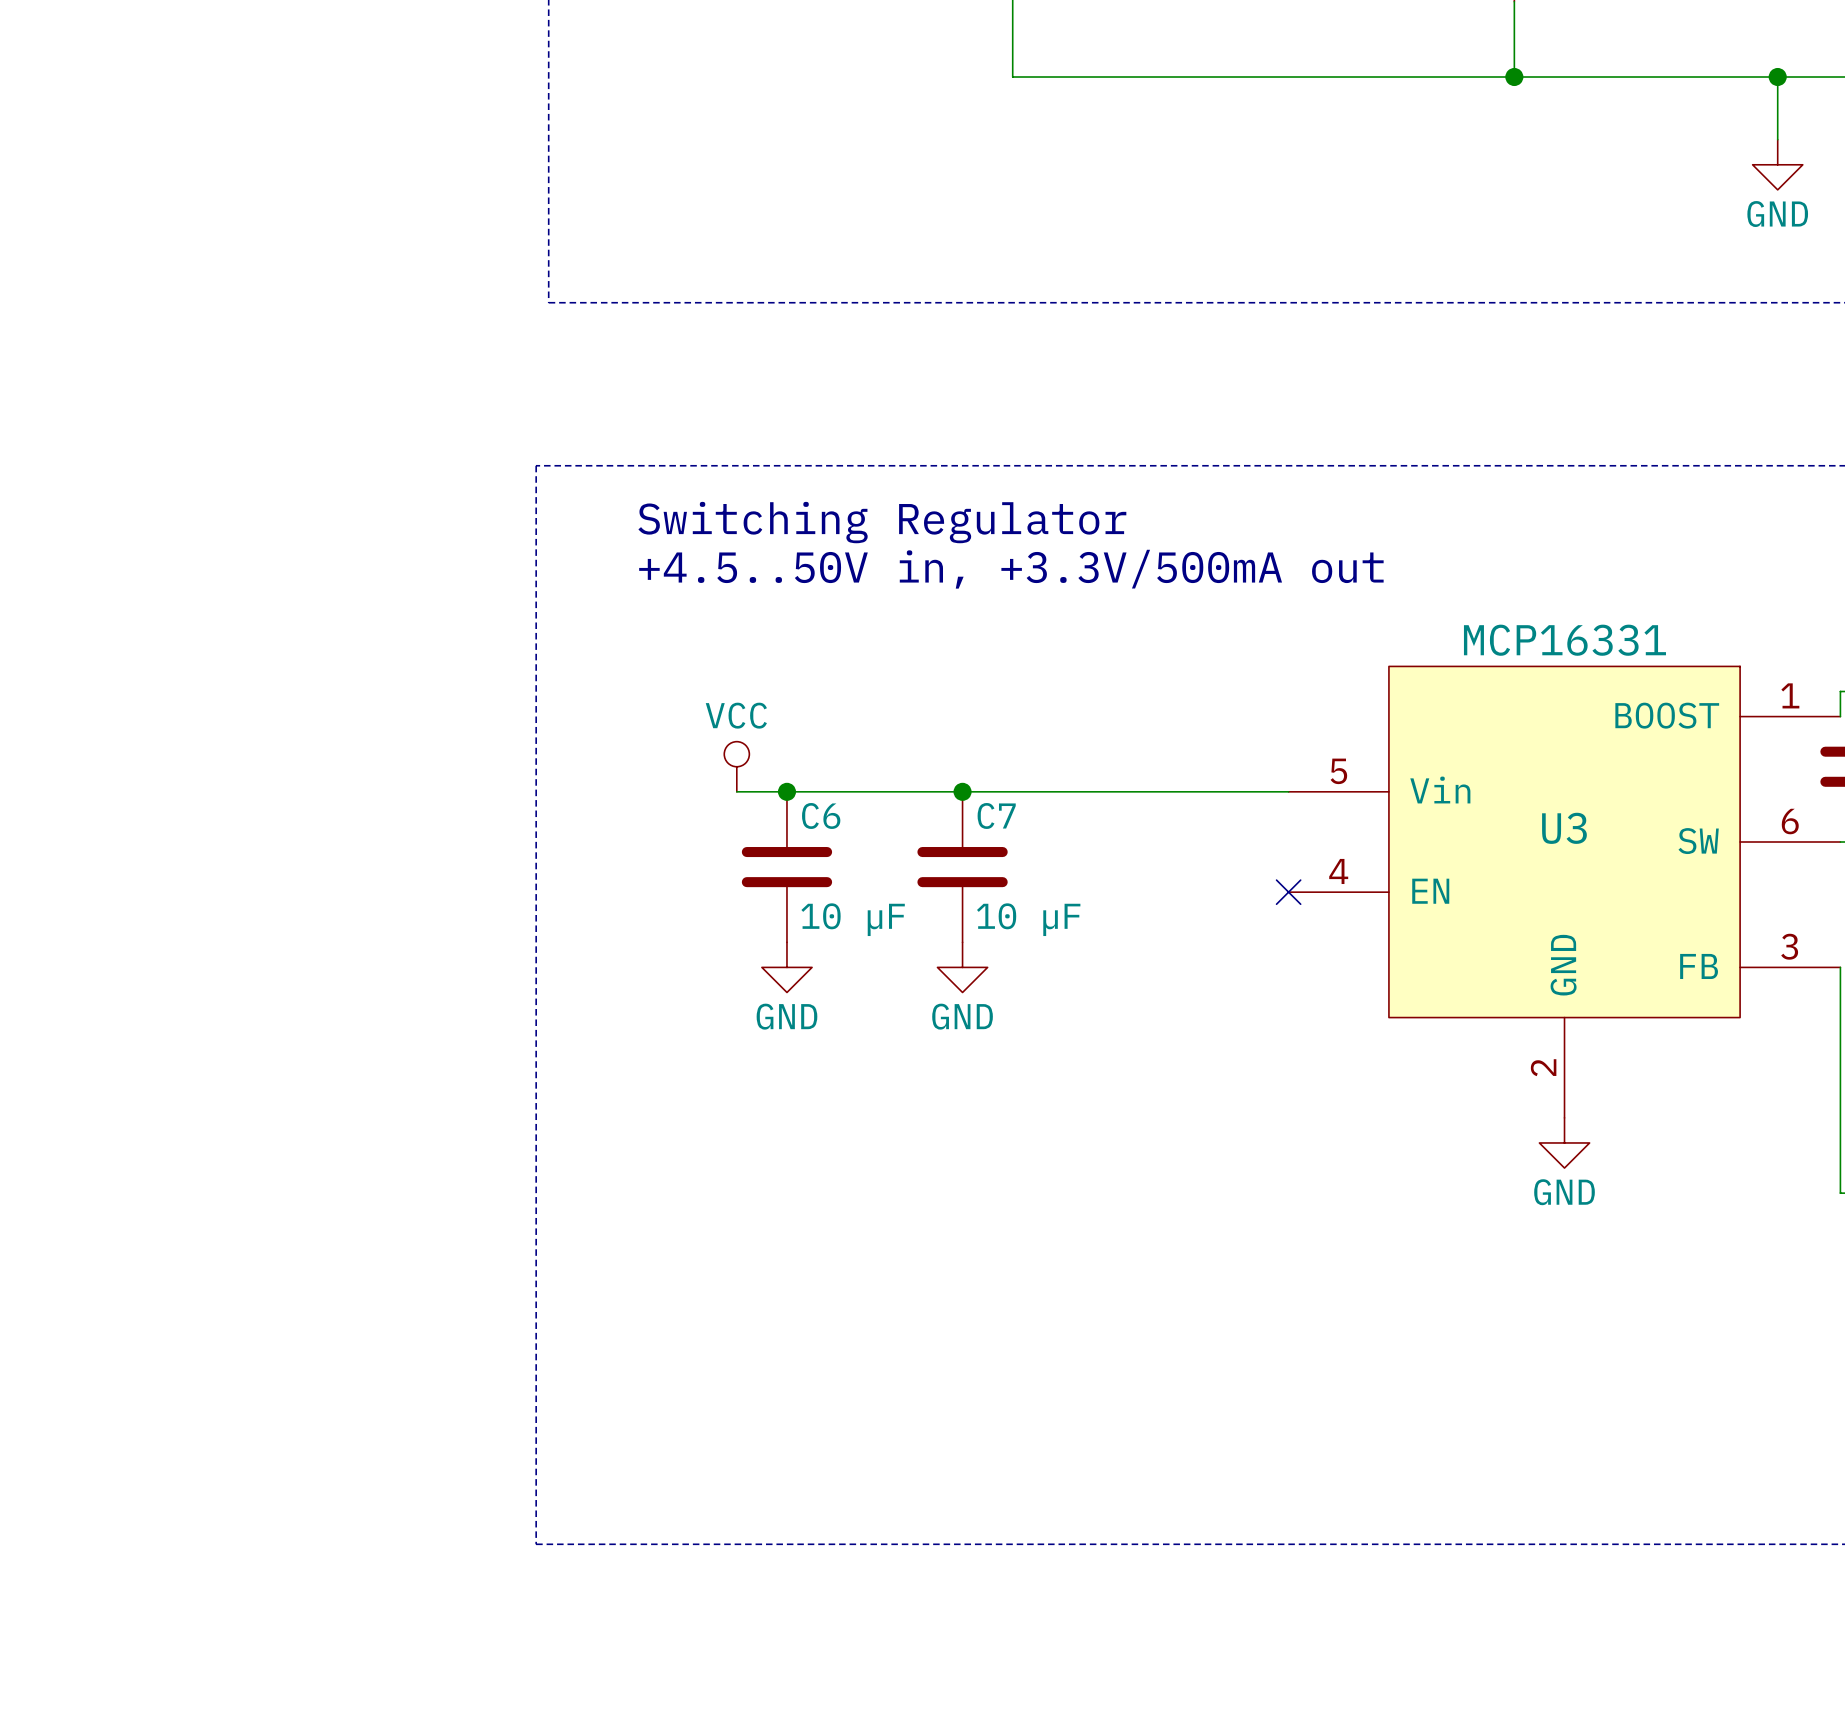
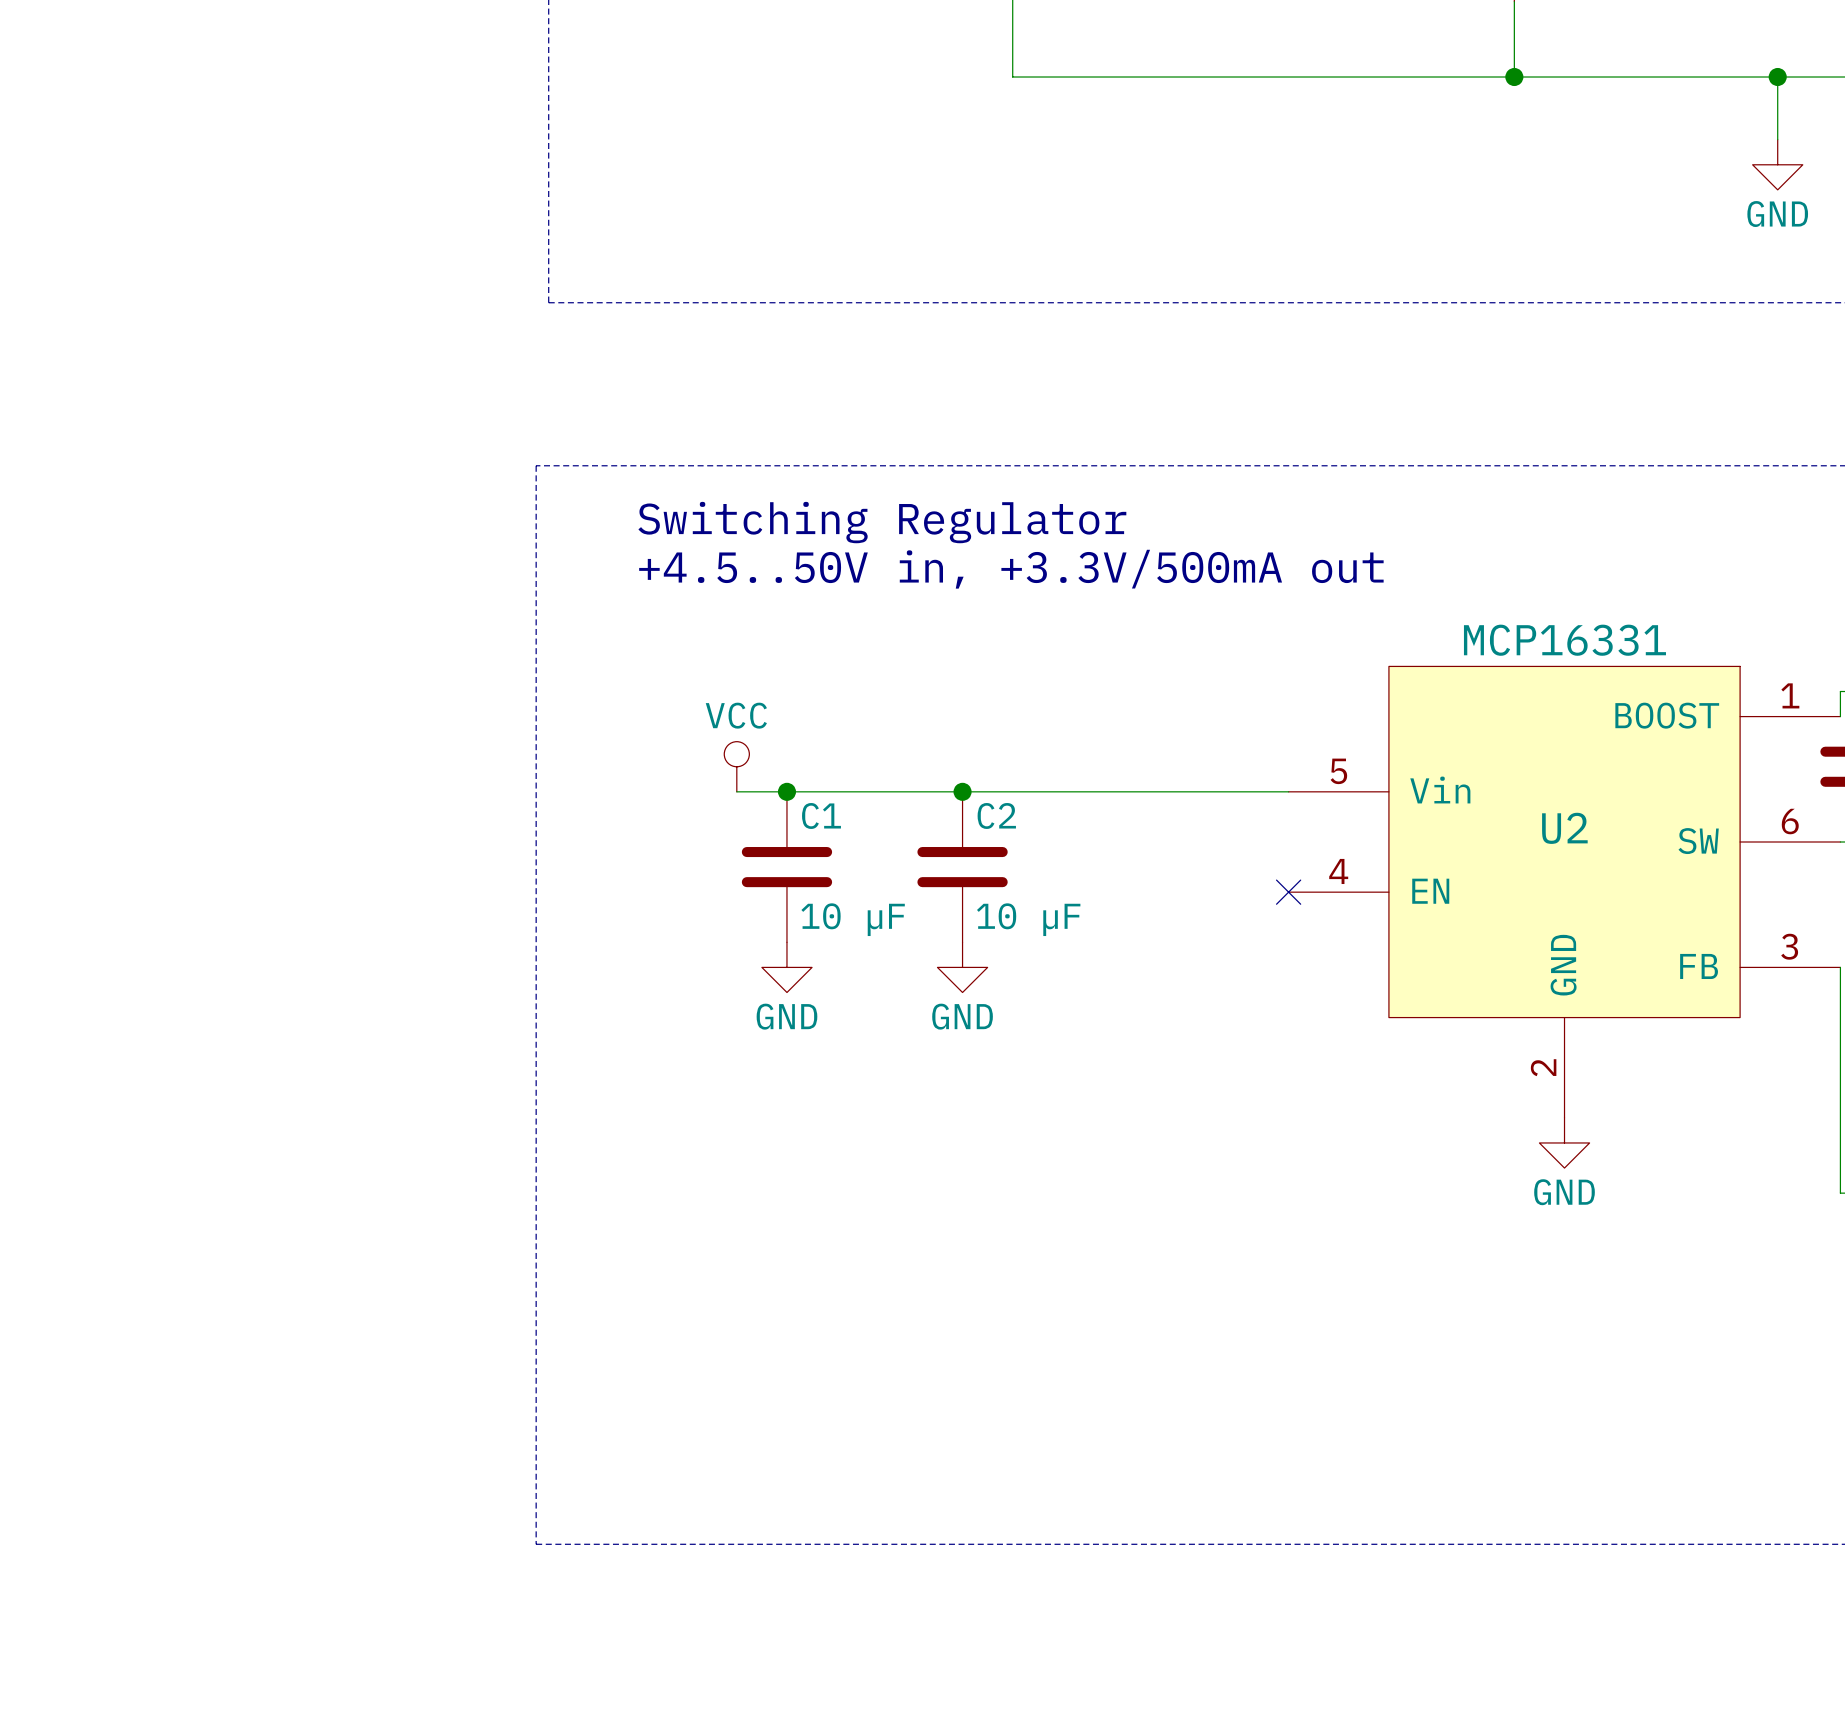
C6 name: C6 (821, 815) -> C1 (821, 815)
C7 name: C7 (996, 815) -> C2 (996, 815)
U3 name: U3 (1564, 828) -> U2 (1564, 828)

